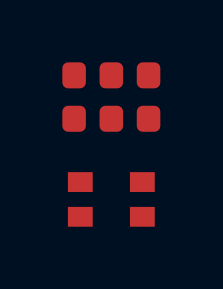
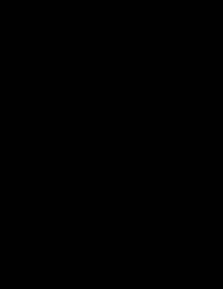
part: (74, 97) -> none
part: (111, 97) -> none
part: (148, 97) -> none
part: (111, 199) -> none

